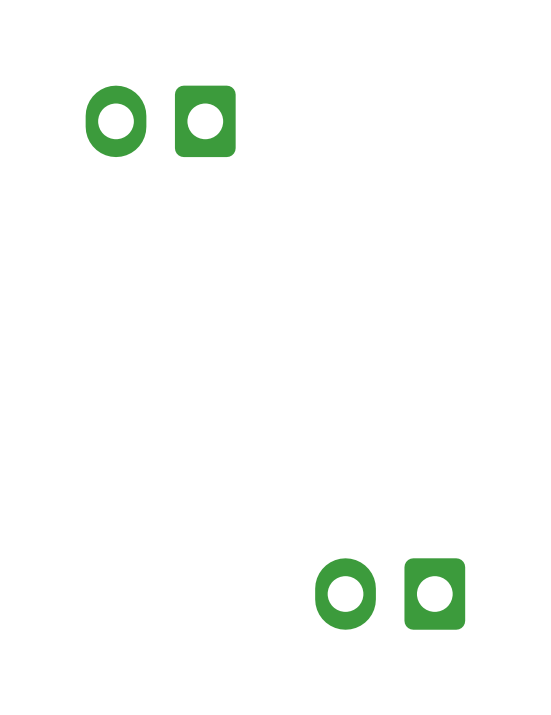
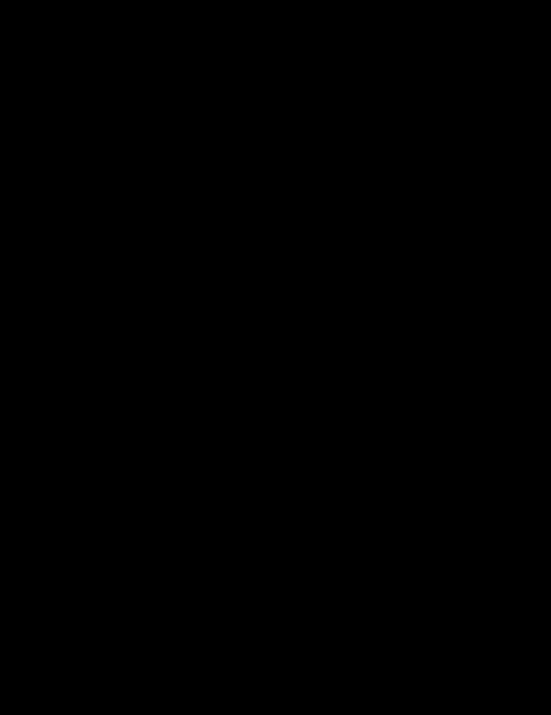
part: (160, 121) -> none
part: (390, 594) -> none

